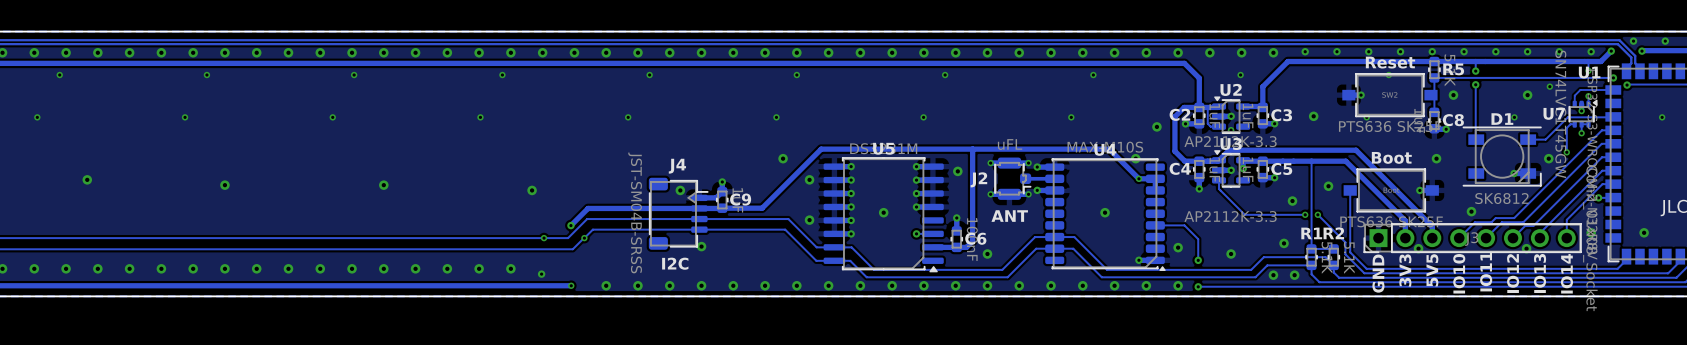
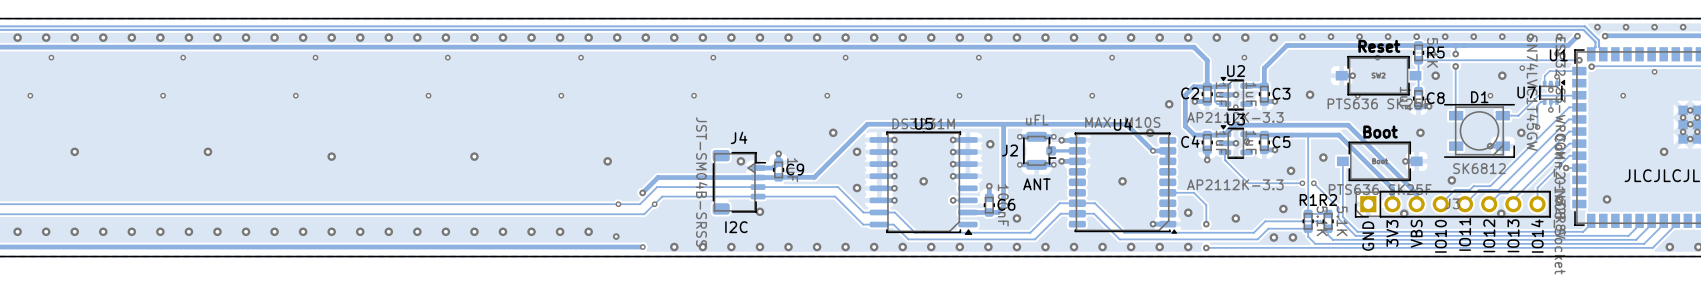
text: 5V5 (1432, 270) -> VBS (1416, 233)

